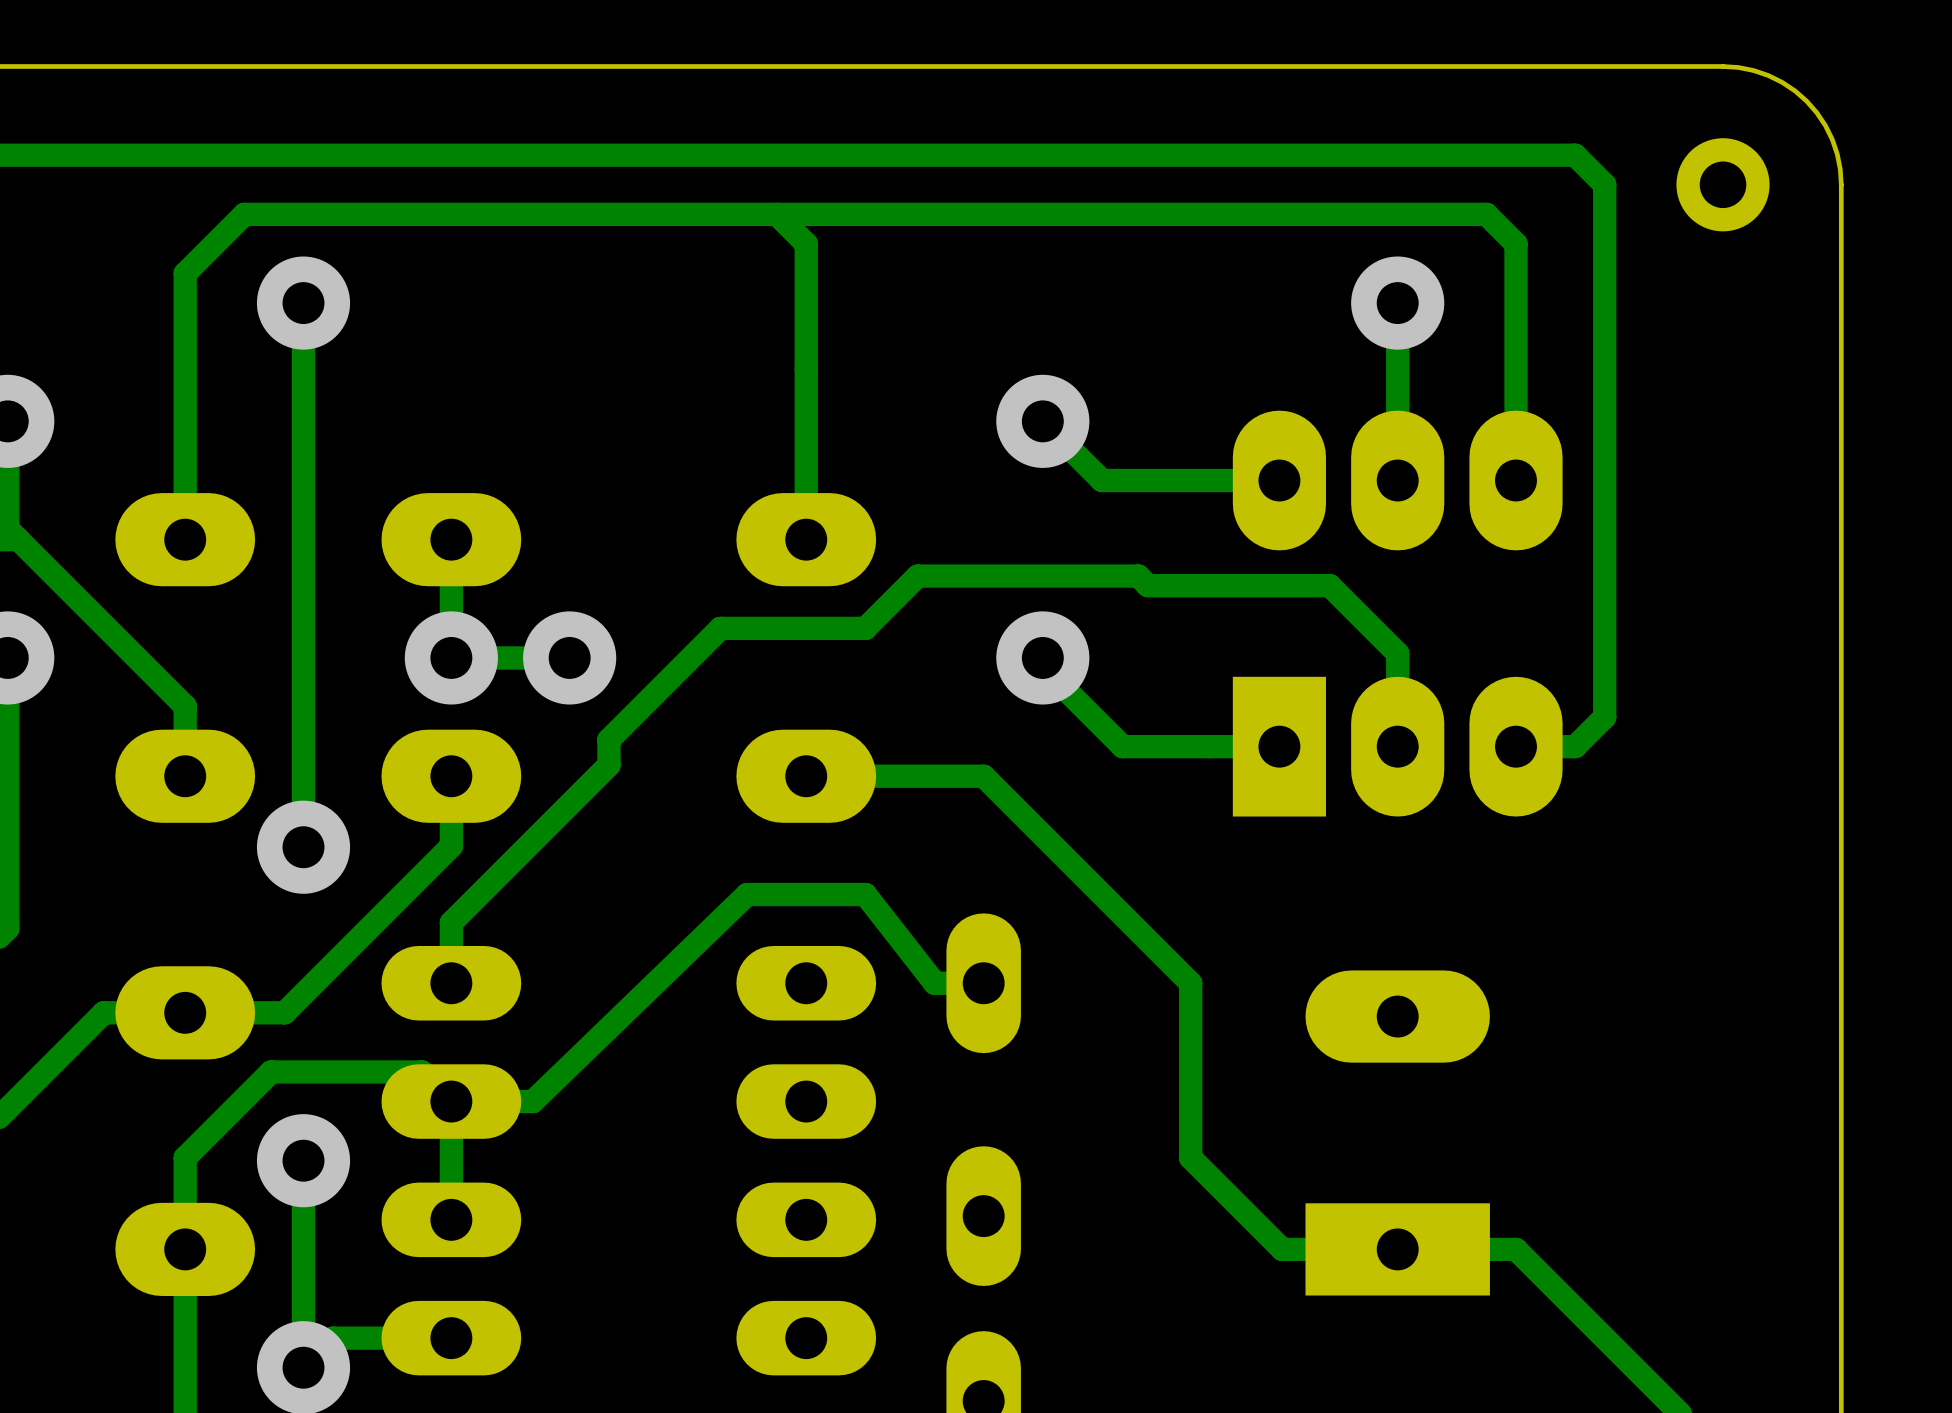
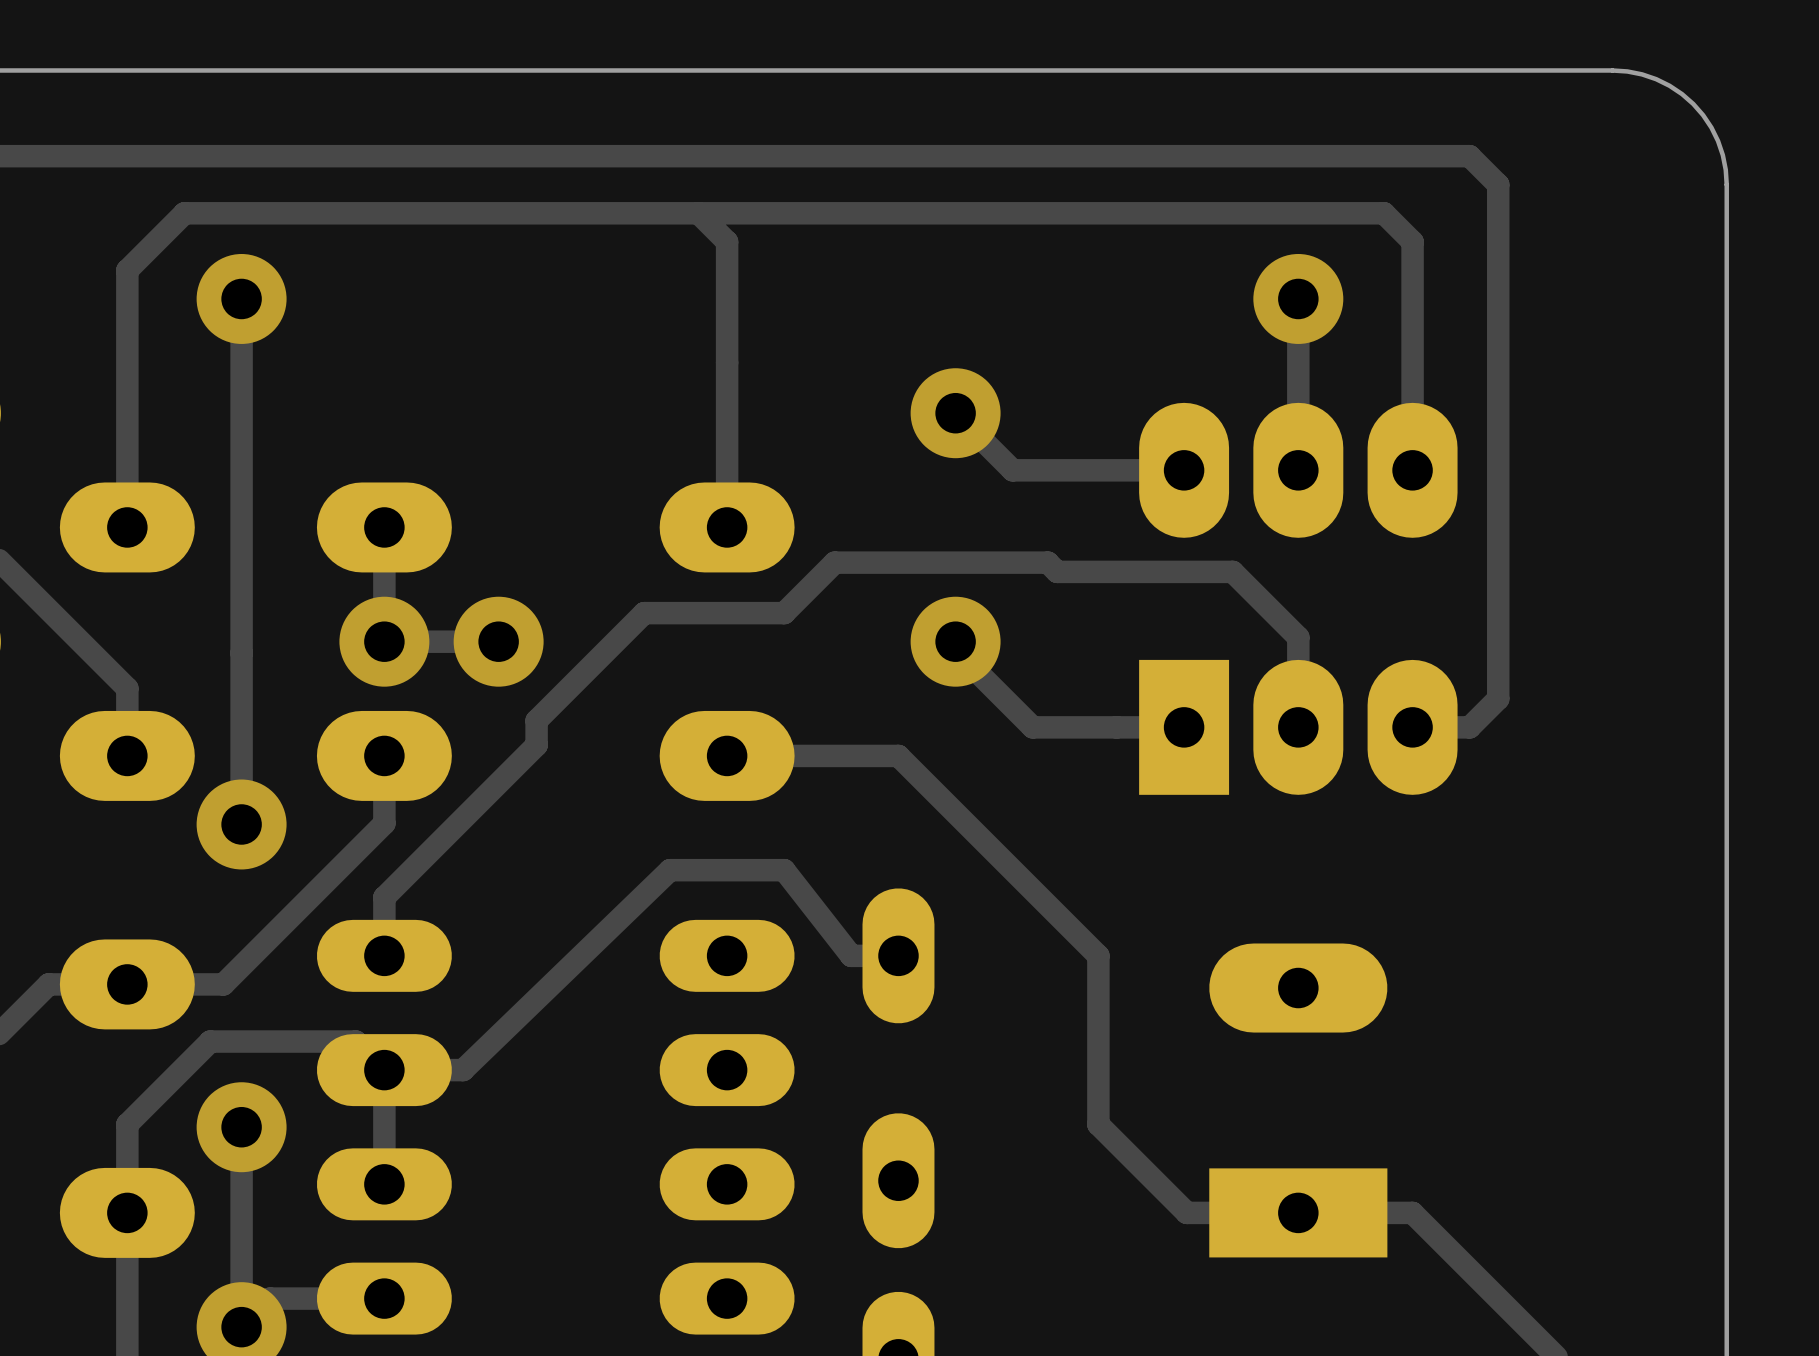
part: (1723, 184) -> none

